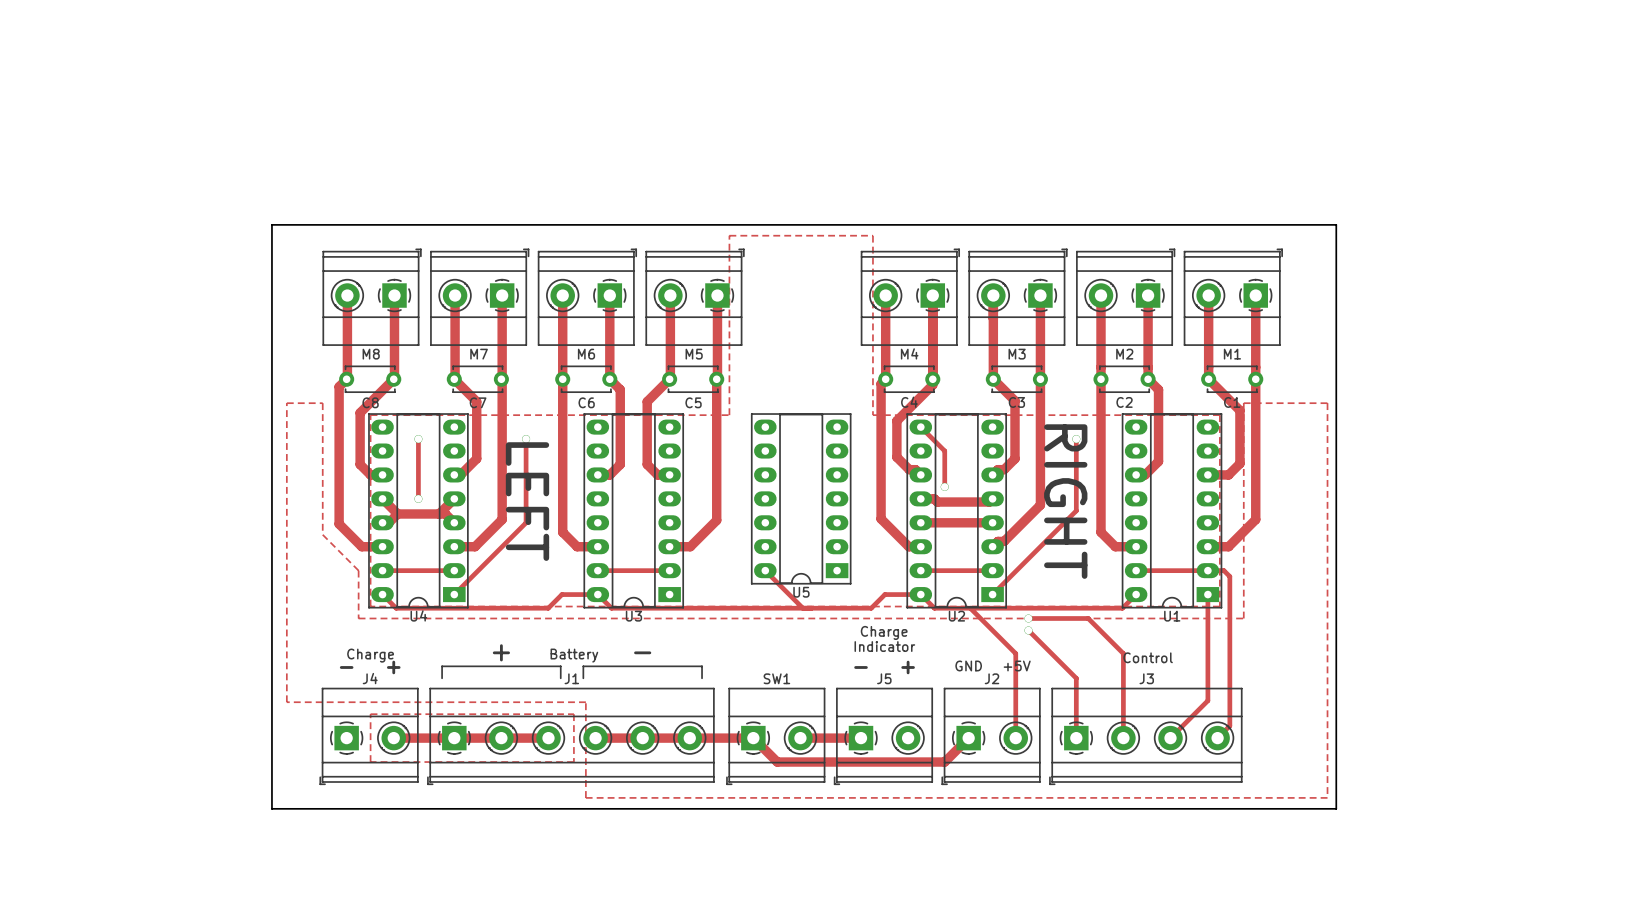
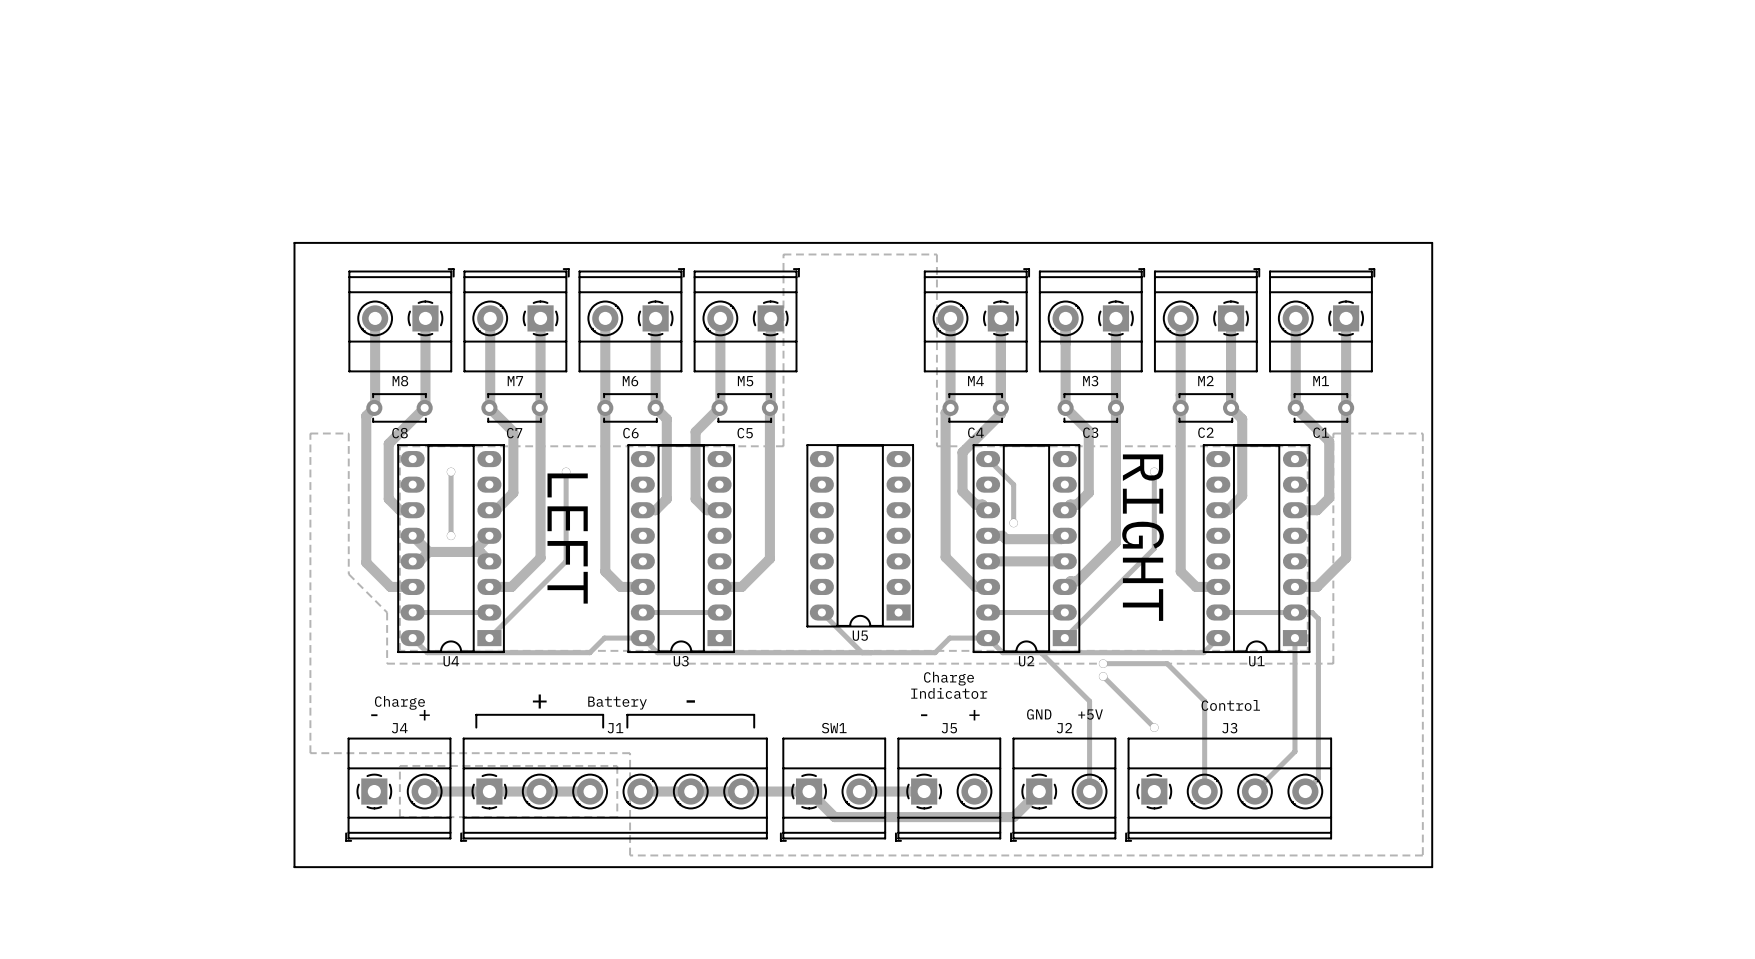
track: (1076, 678) (1076, 738) -> none
via: none -> (1154, 727)

